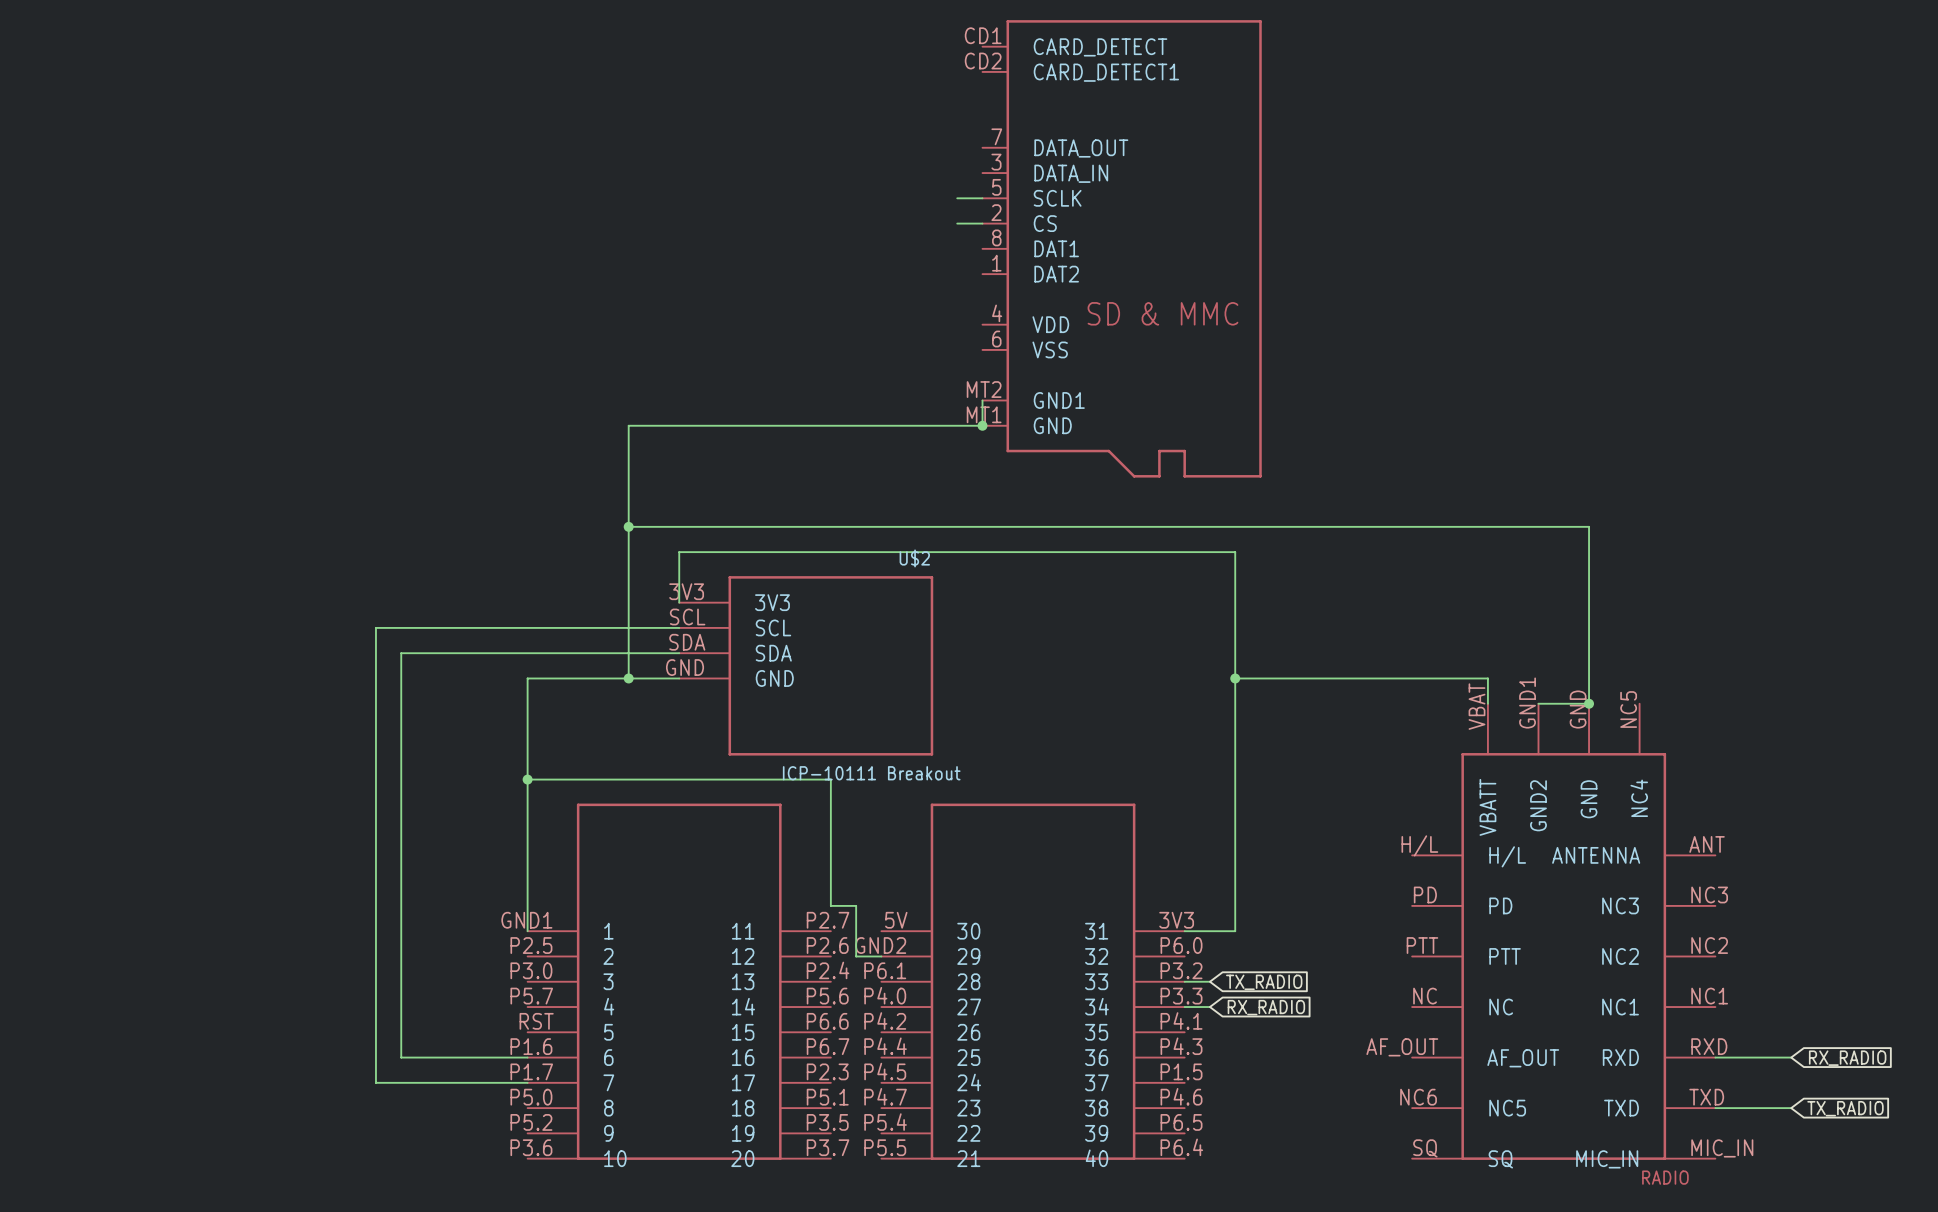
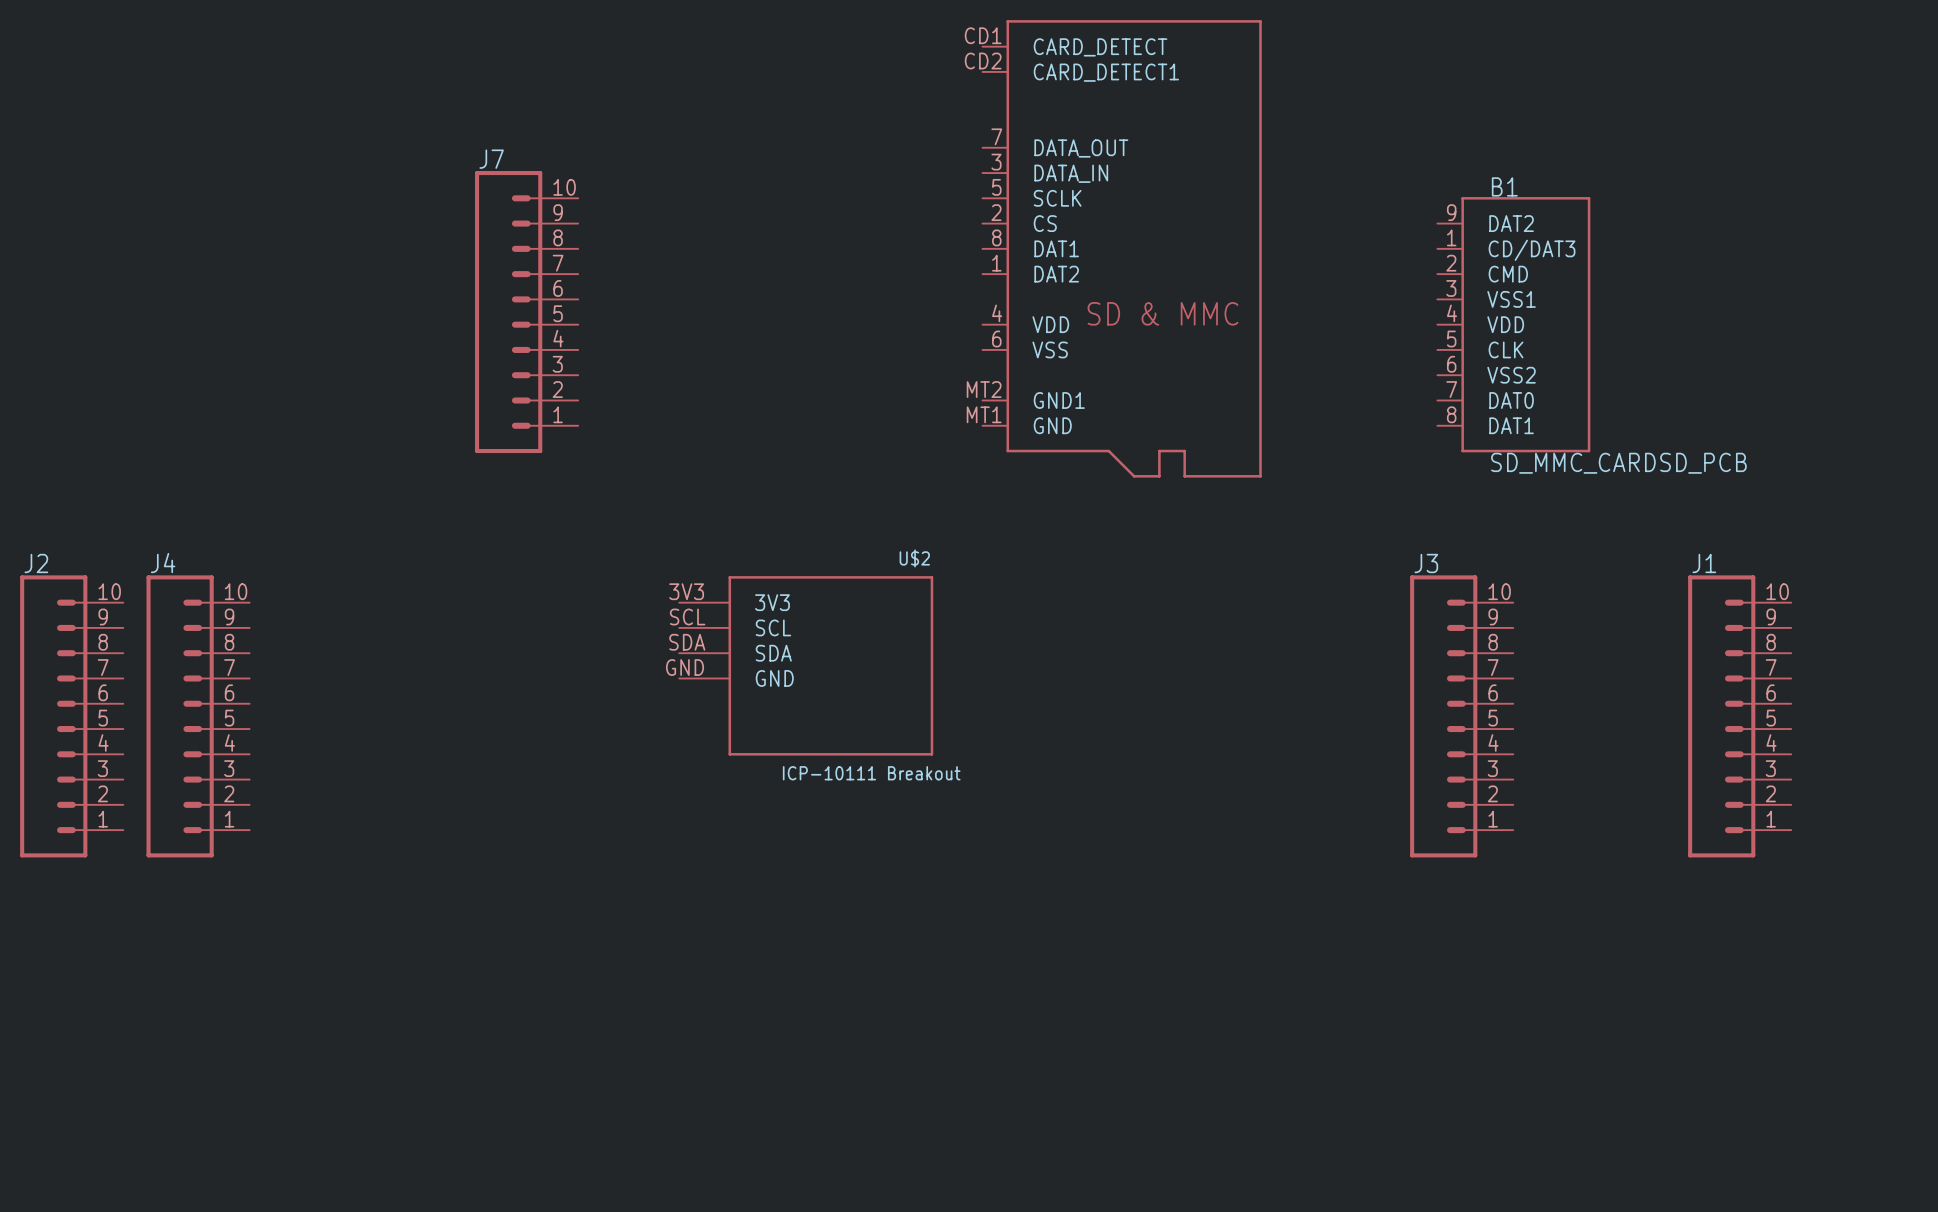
wire: (957, 198) (982, 198) -> none
wire: (957, 223) (982, 223) -> none
J7: none -> (526, 312)
B1: none -> SD_MMC_CARDSD_PCB (1513, 324)
wire: (982, 400) (982, 425) (628, 425) (628, 678) -> none
junction: (982, 425) -> none
wire: (628, 526) (1589, 526) (1589, 703) (1538, 703) -> none
junction: (628, 526) -> none
wire: (679, 602) (679, 552) (1235, 552) (1235, 931) (1184, 931) -> none
wire: (679, 627) (375, 627) (375, 1082) (527, 1082) -> none
wire: (679, 653) (401, 653) (401, 1057) (527, 1057) -> none
junction: (628, 678) -> none
wire: (679, 678) (527, 678) (527, 931) -> none
wire: (1235, 678) (1487, 678) (1487, 703) -> none
junction: (1235, 678) -> none
junction: (1589, 703) -> none
J2: none -> (71, 716)
J4: none -> (198, 716)
J3: none -> (1461, 716)
J1: none -> (1739, 716)
wire: (527, 779) (830, 779) (830, 905) (856, 905) (856, 956) (881, 956) -> none
junction: (527, 779) -> none
part: (1563, 931) -> none
part: (856, 981) -> none
wire: (1184, 981) (1209, 981) -> none
global label: TX_RADIO (1264, 982) -> none
wire: (1184, 1007) (1209, 1007) -> none
global label: RX_RADIO (1266, 1007) -> none
wire: (1715, 1057) (1791, 1057) -> none
global label: RX_RADIO (1847, 1058) -> none
wire: (1715, 1108) (1791, 1108) -> none
global label: TX_RADIO (1845, 1108) -> none

